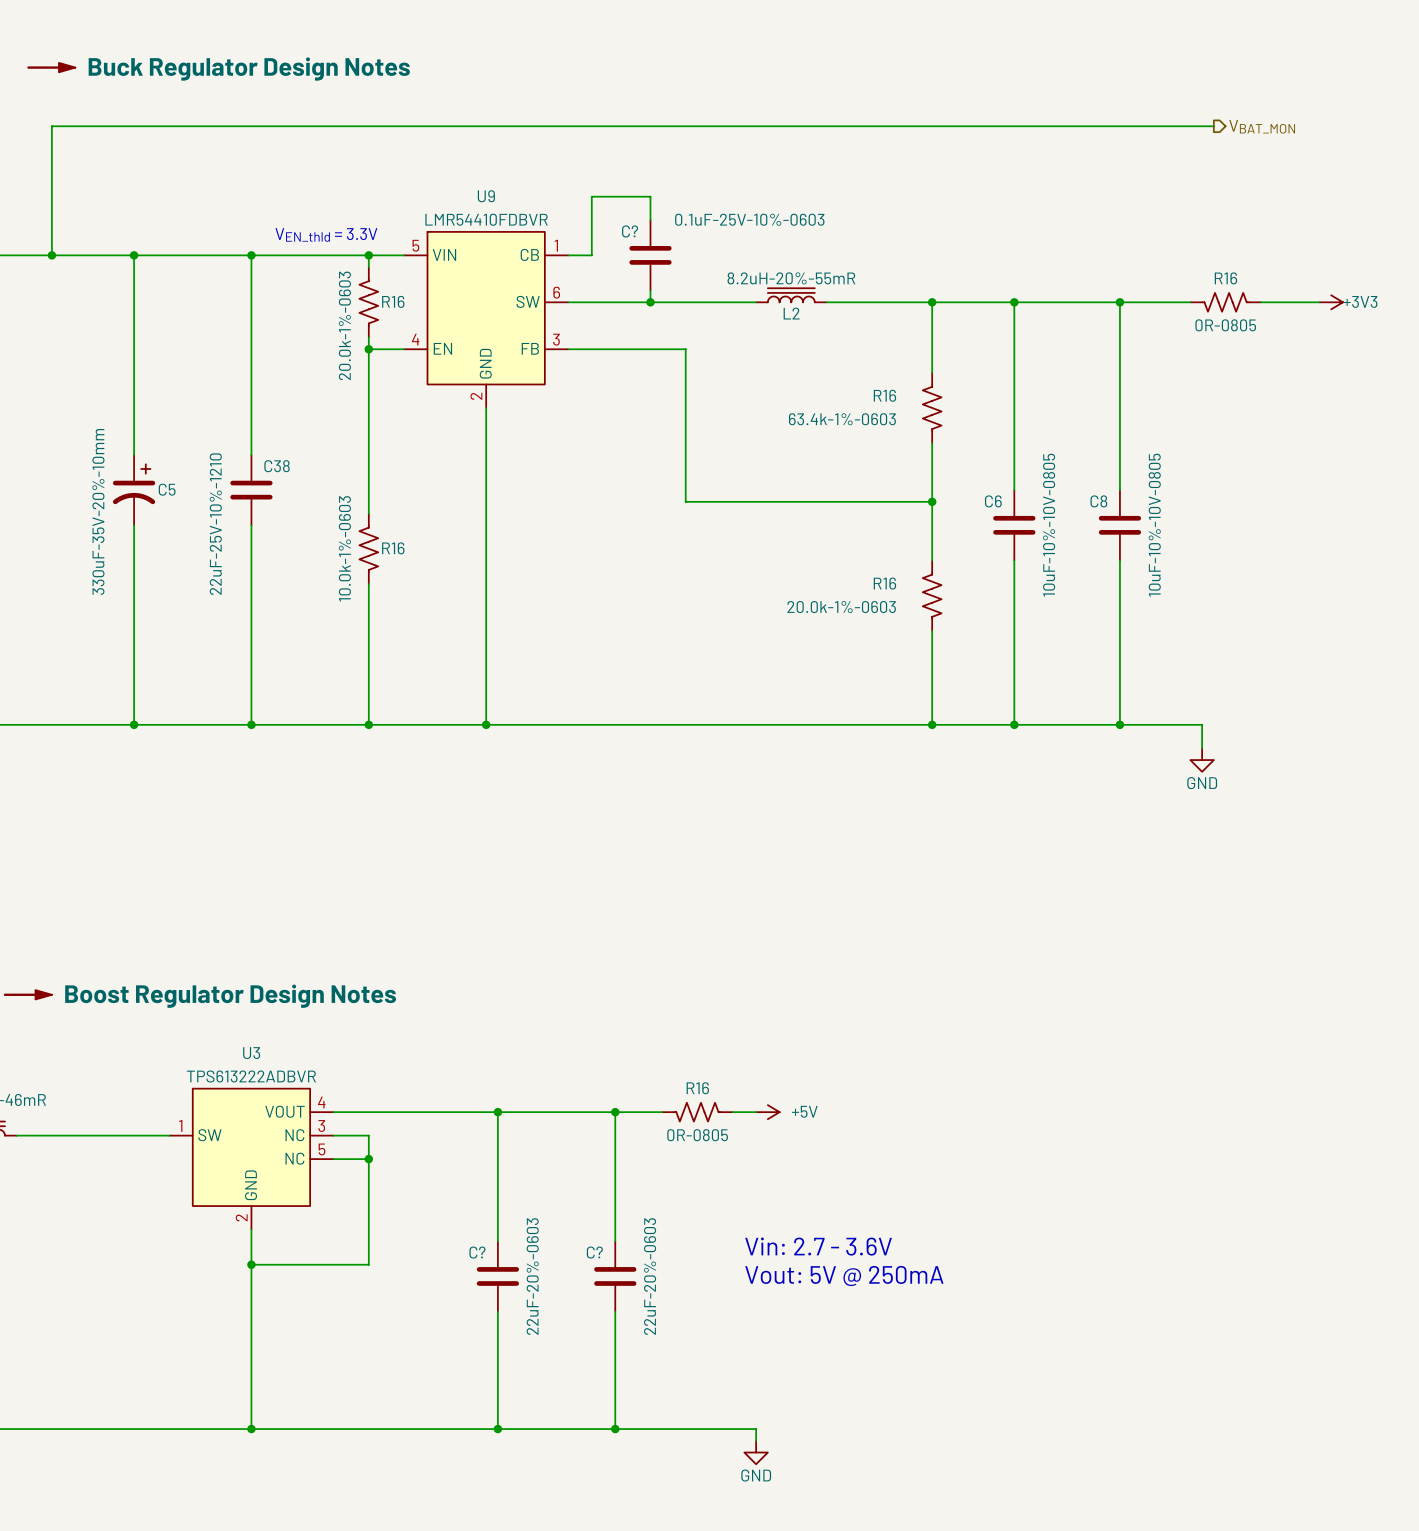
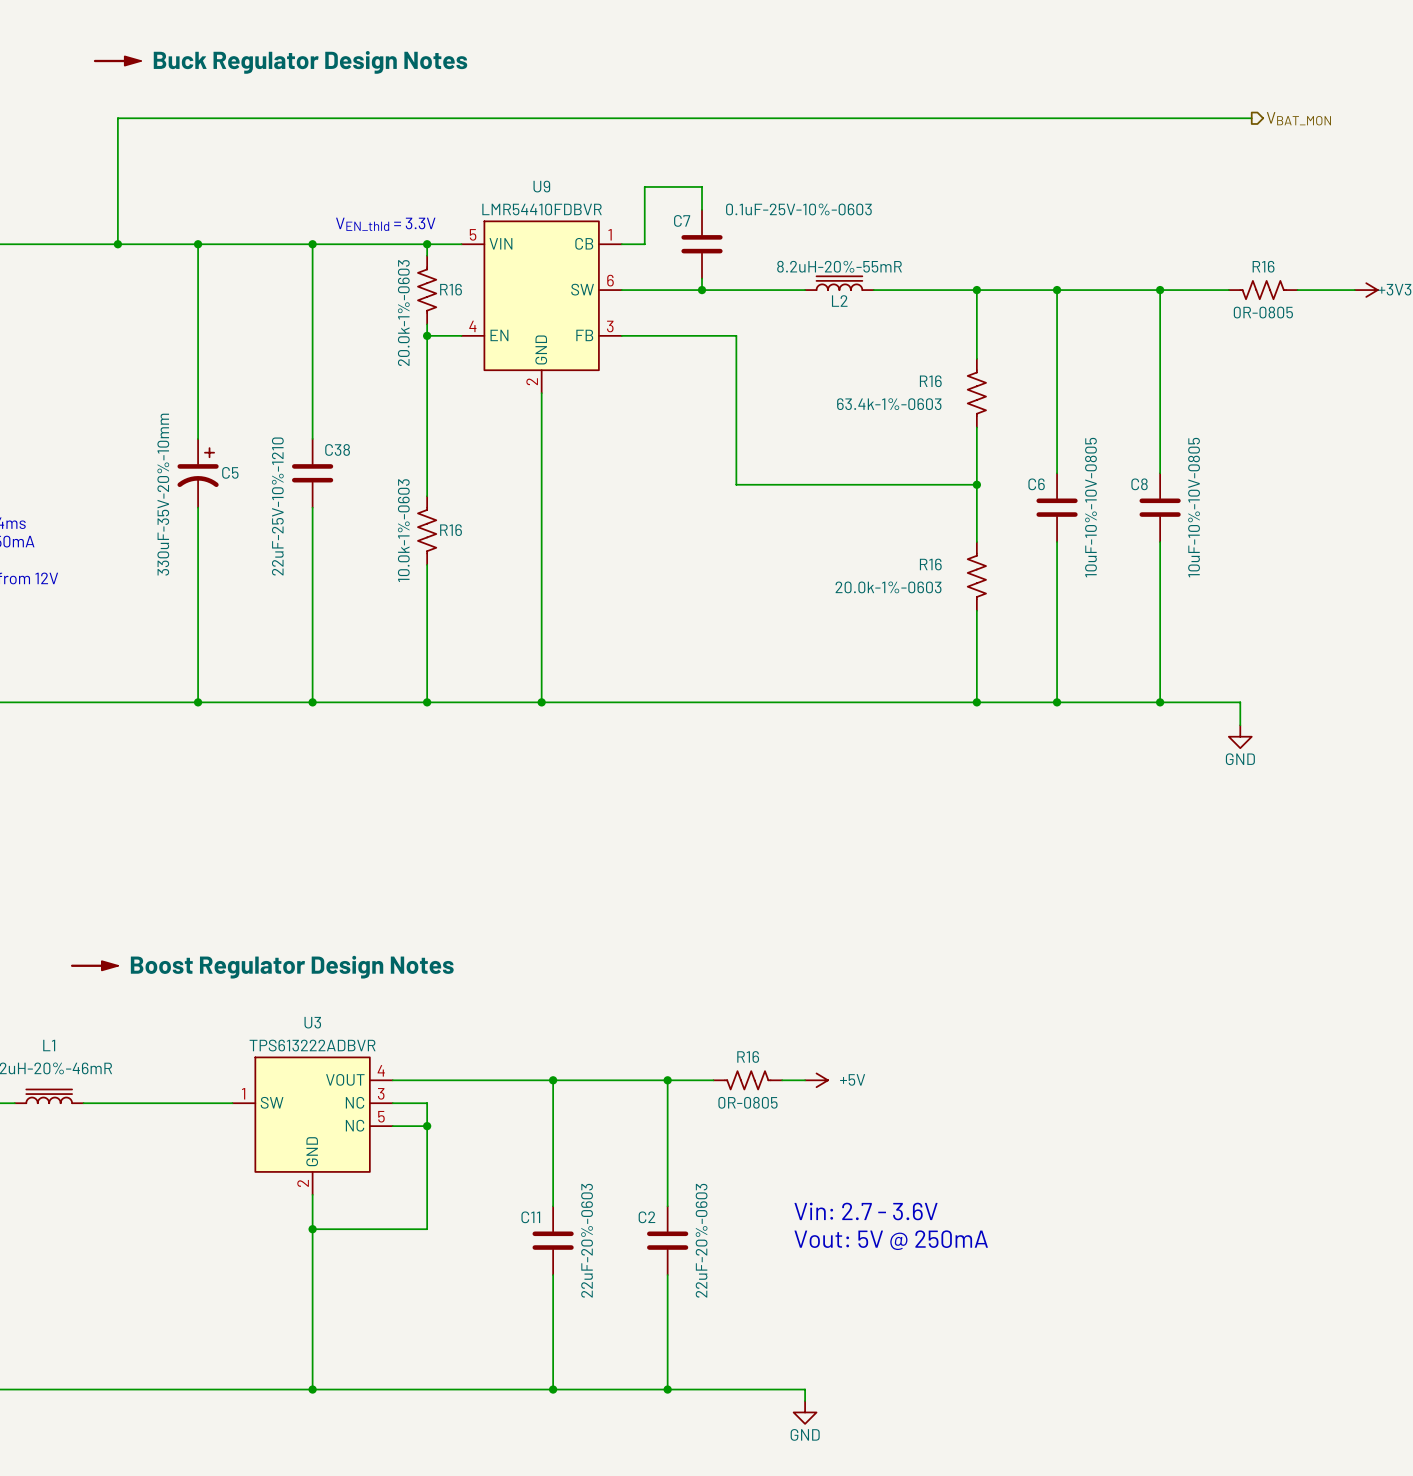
C? name: C? (630, 231) -> C7 (682, 220)
C? name: C? (477, 1252) -> C11 (530, 1217)
C? name: C? (594, 1252) -> C2 (646, 1217)

